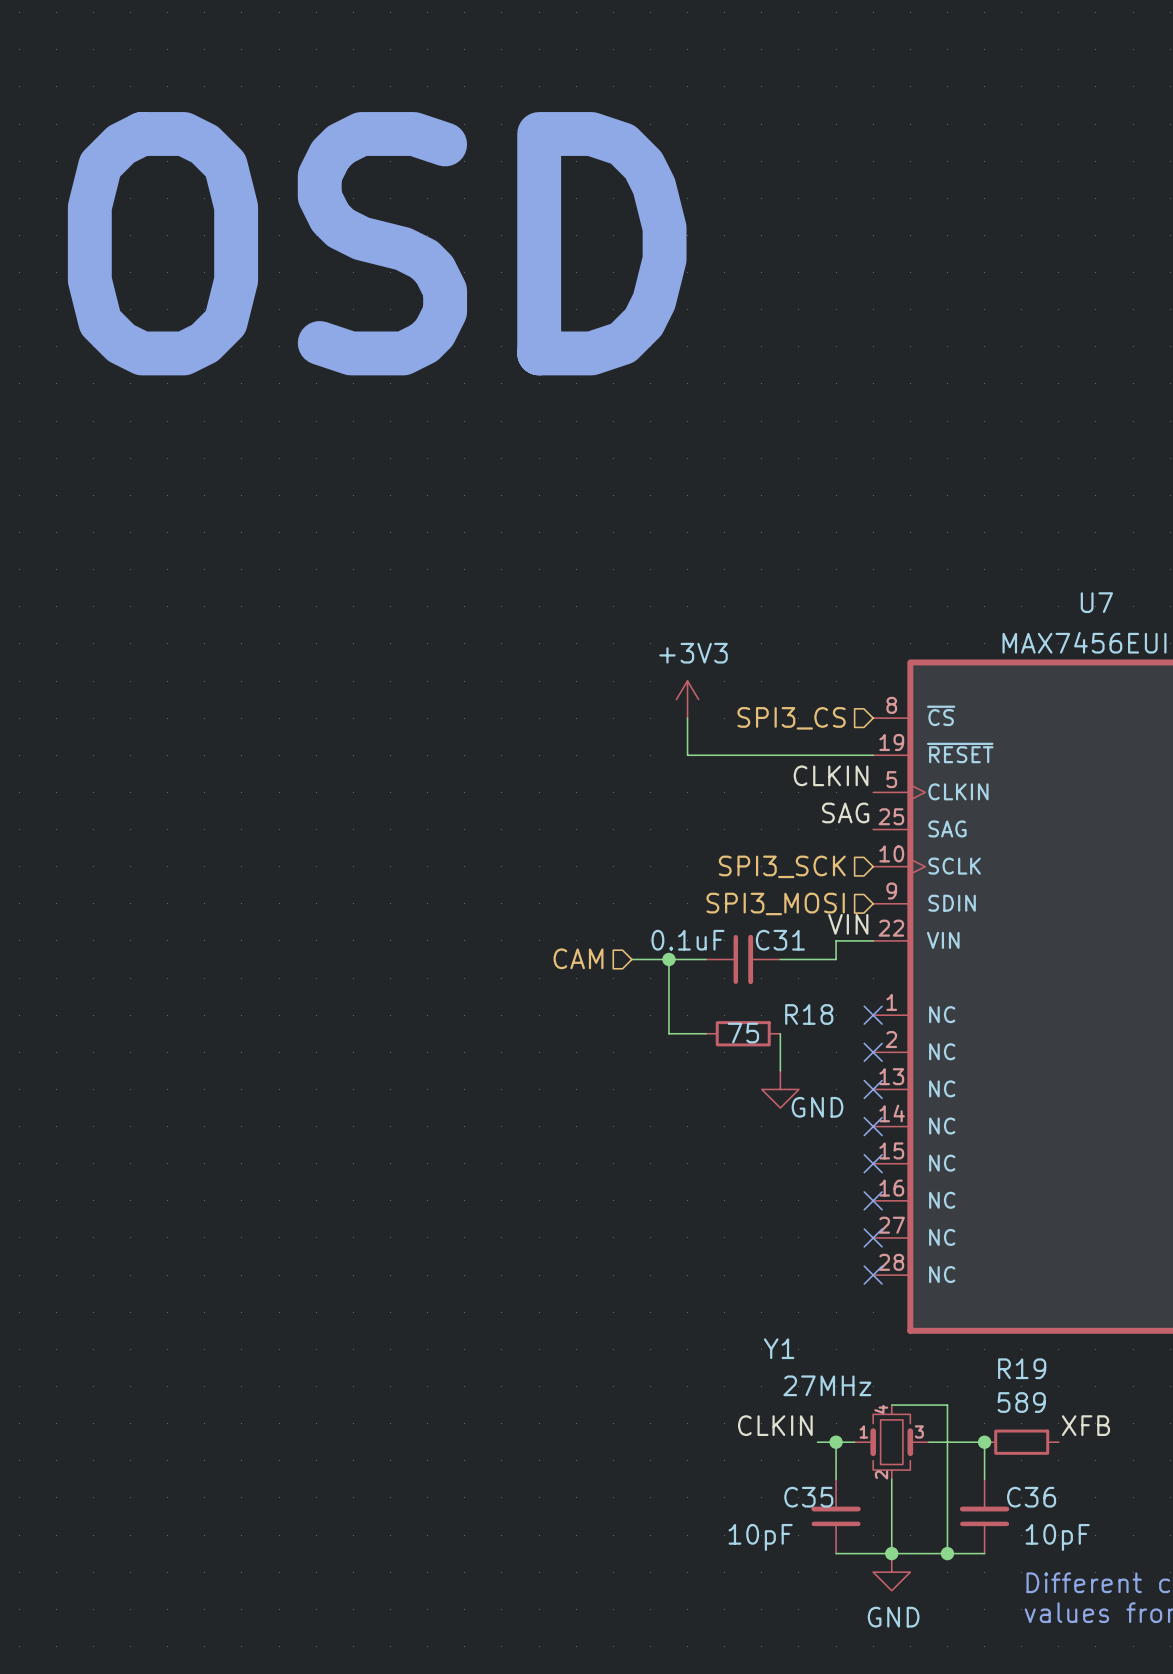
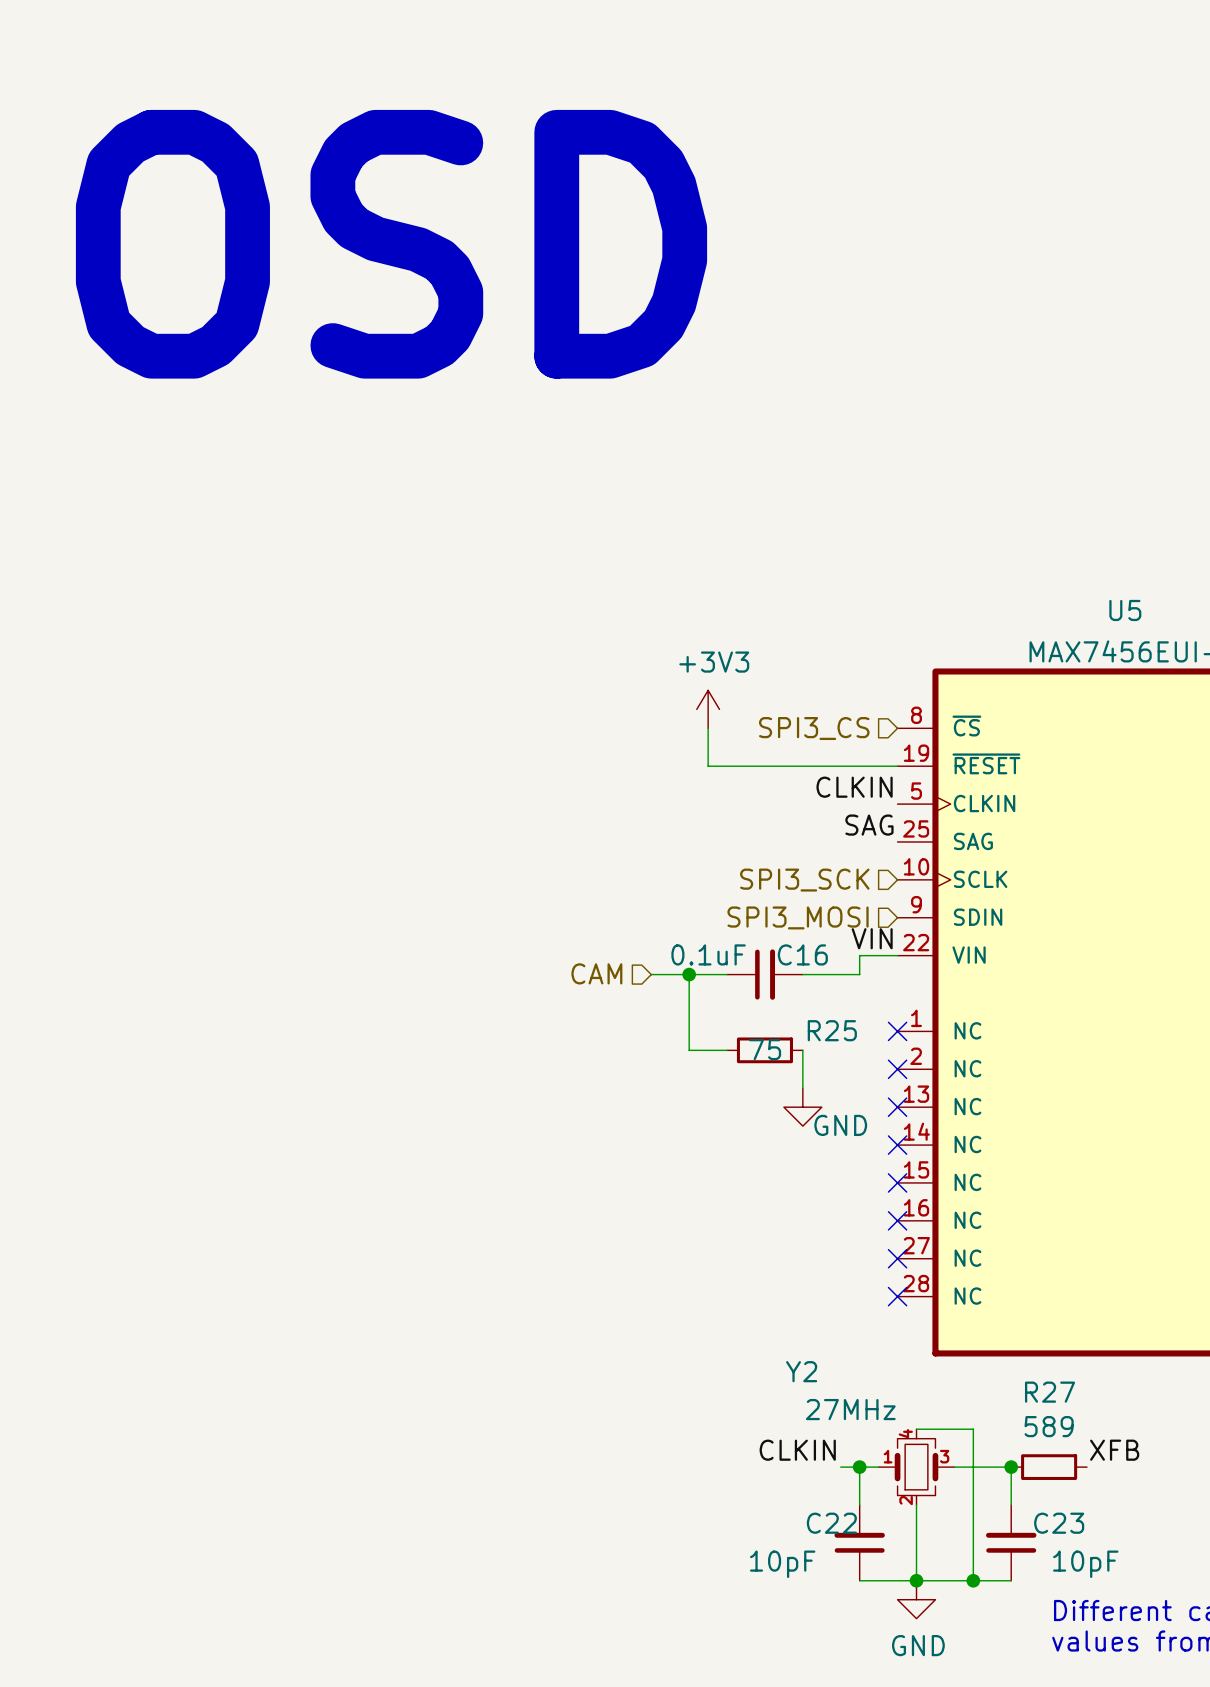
U7 name: U7 (1096, 602) -> U5 (1125, 610)
C31 name: C31 (780, 940) -> C16 (802, 954)
R18 name: R18 (809, 1014) -> R25 (832, 1030)
Y1 name: Y1 (779, 1348) -> Y2 (801, 1371)
R19 name: R19 (1022, 1368) -> R27 (1050, 1392)
C35 name: C35 (808, 1497) -> C22 (831, 1523)
C36 name: C36 (1031, 1497) -> C23 (1059, 1523)

